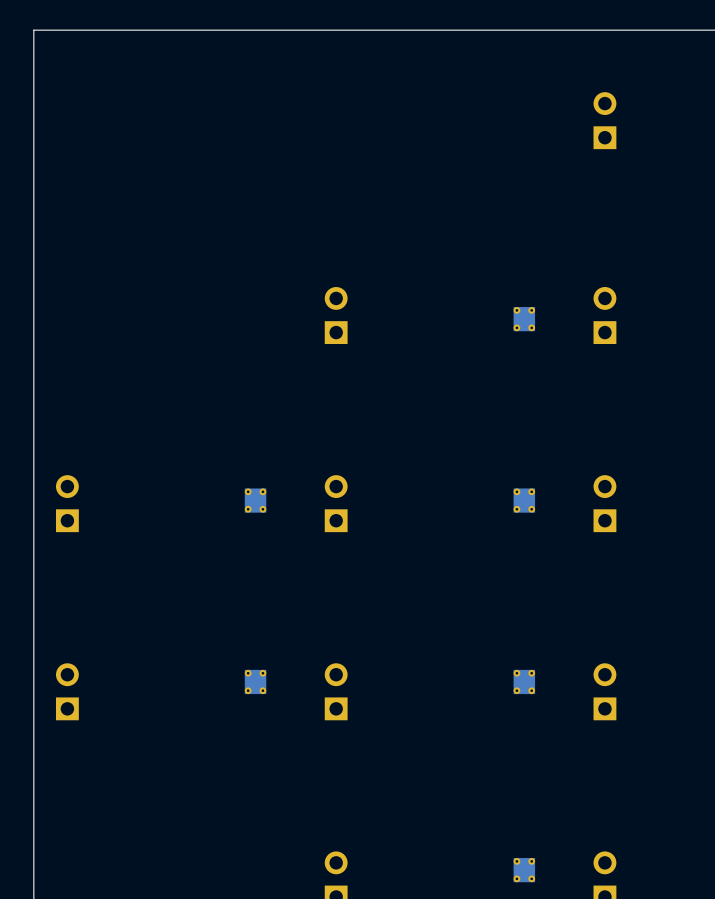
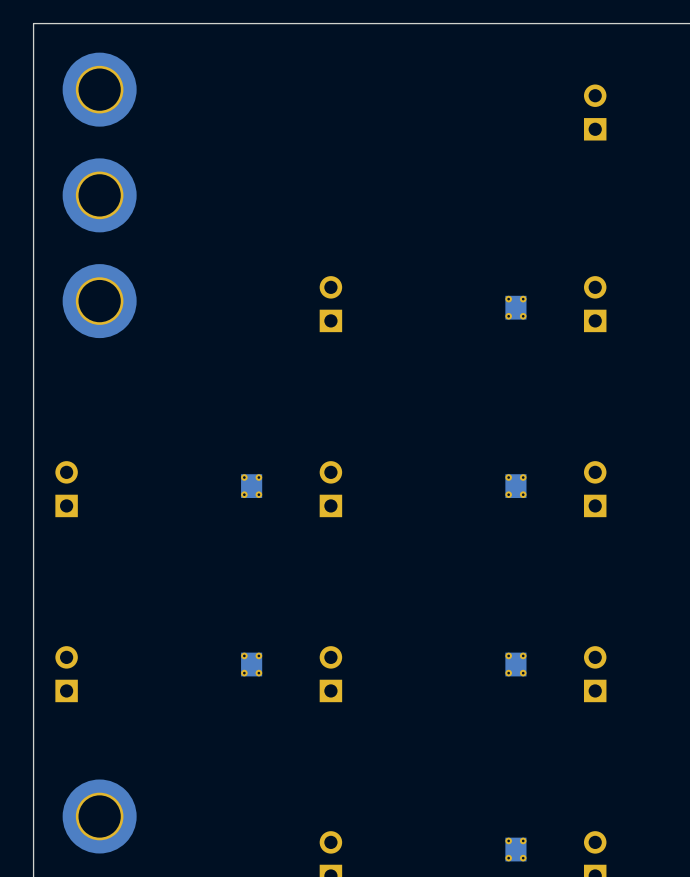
part: none -> (99, 89)
part: none -> (99, 195)
part: none -> (99, 301)
part: none -> (99, 816)

